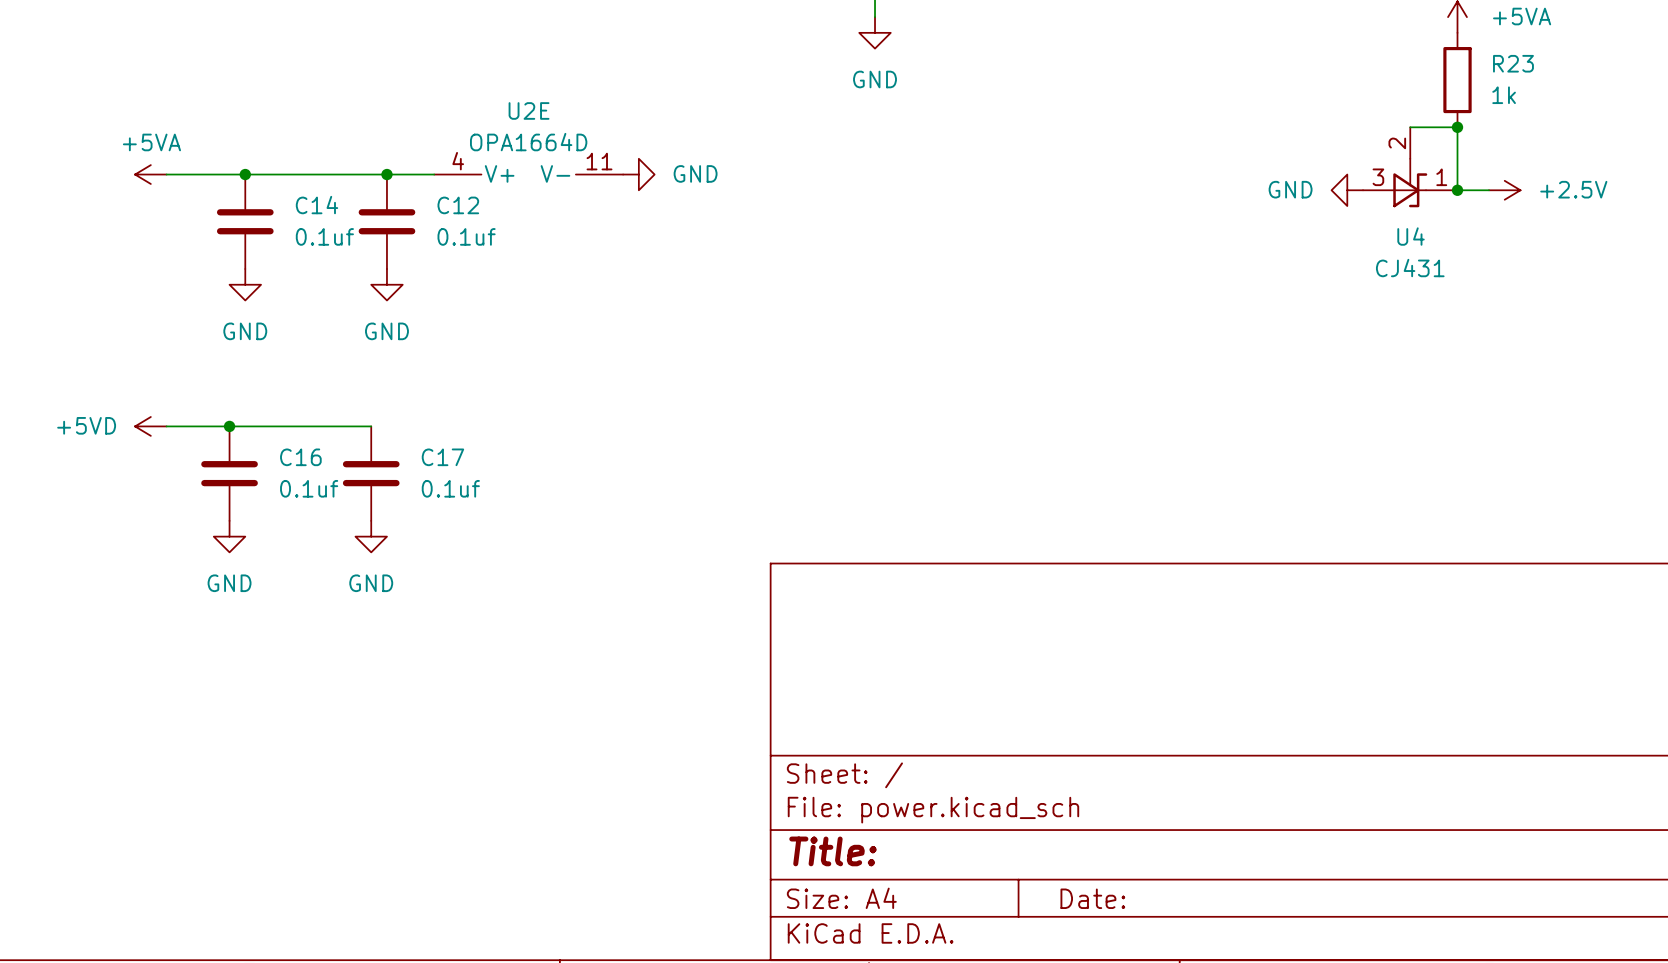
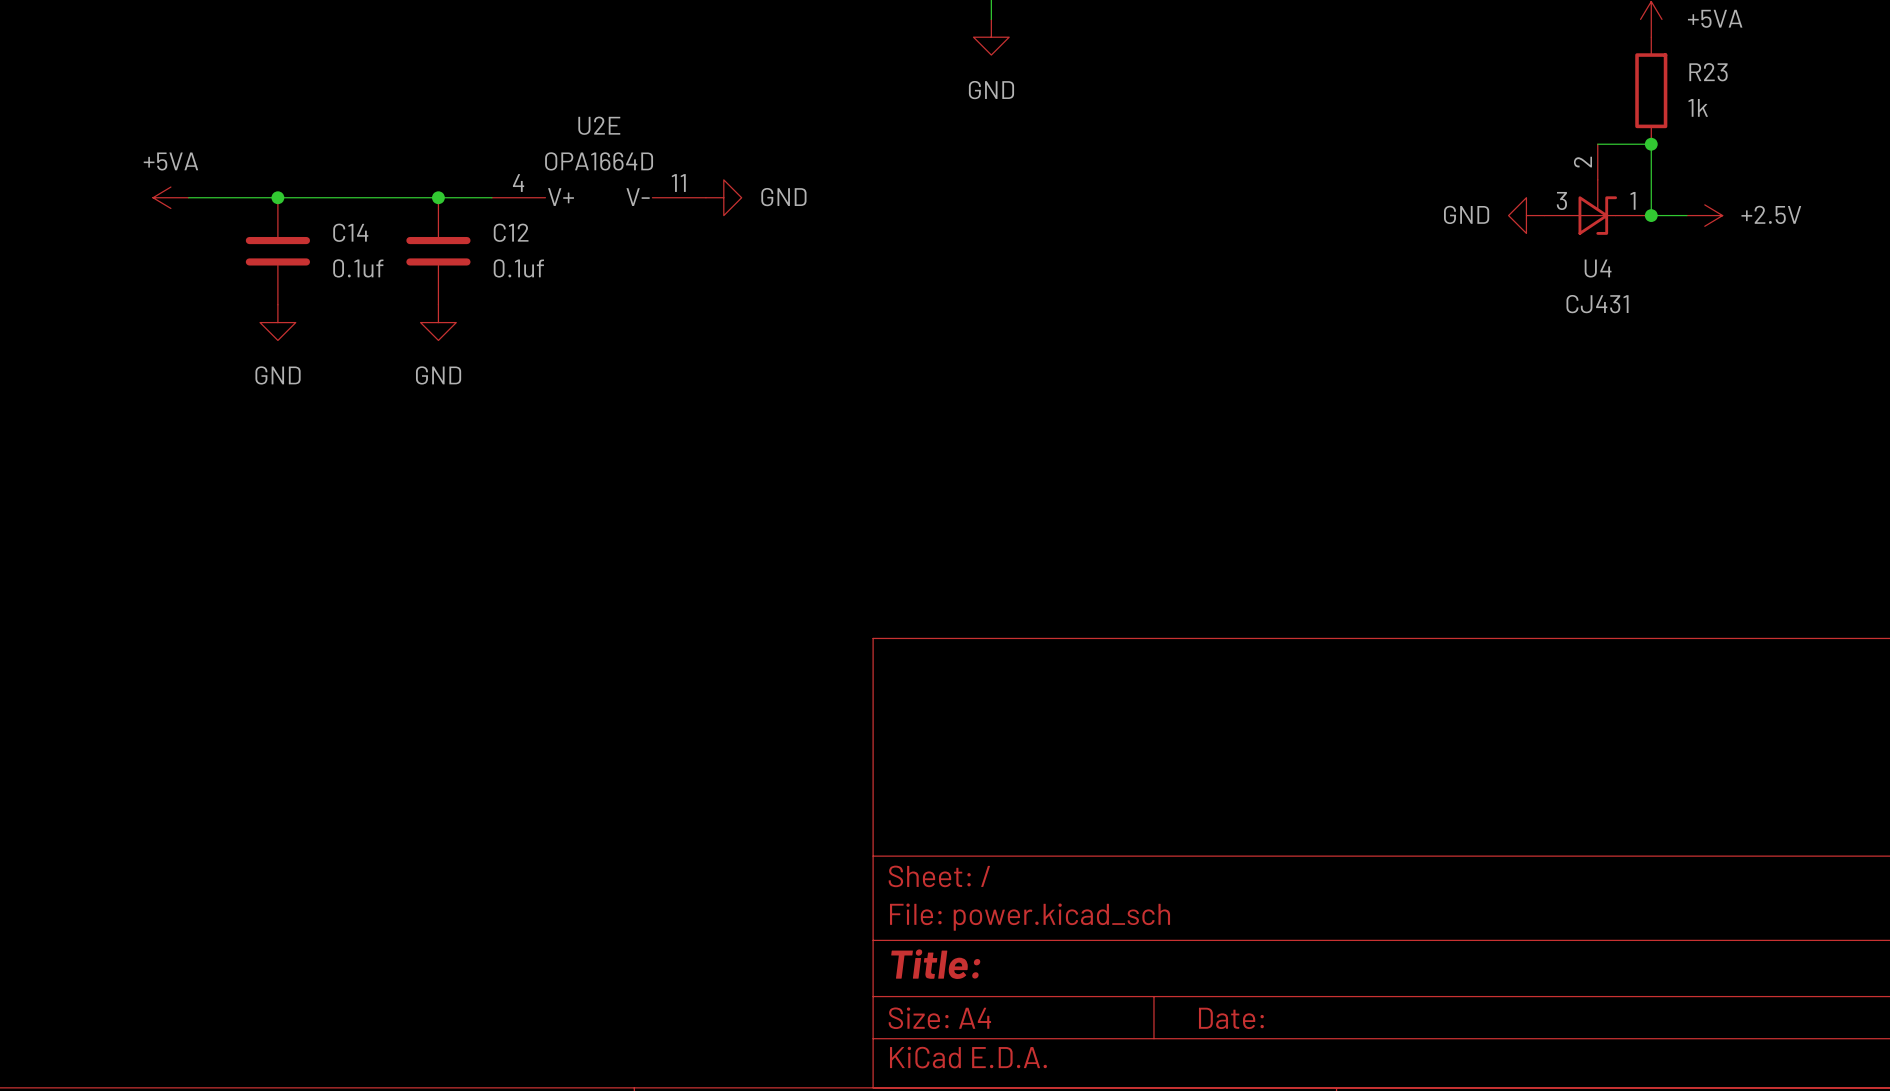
power symbol: +5VD (150, 426) -> none
wire: (166, 426) (371, 426) -> none
junction: (229, 426) -> none
C16: 0.1uf (229, 473) -> none
C17: 0.1uf (371, 473) -> none
power symbol: GND (229, 536) -> none
power symbol: GND (371, 536) -> none

